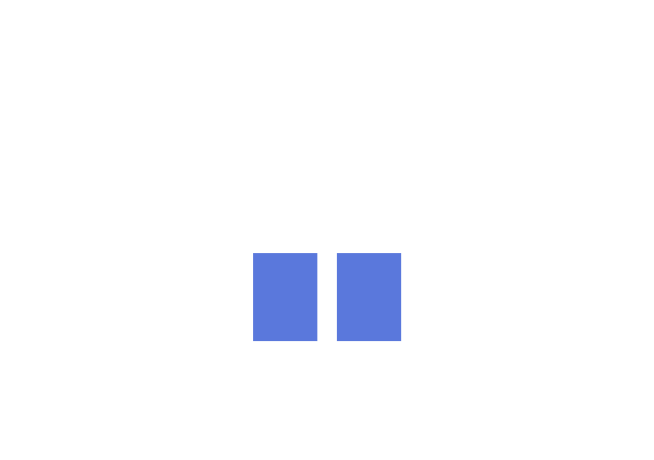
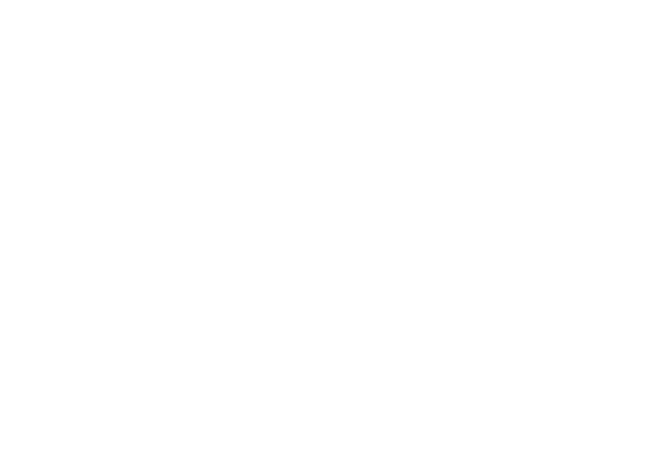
part: (327, 297) -> none

